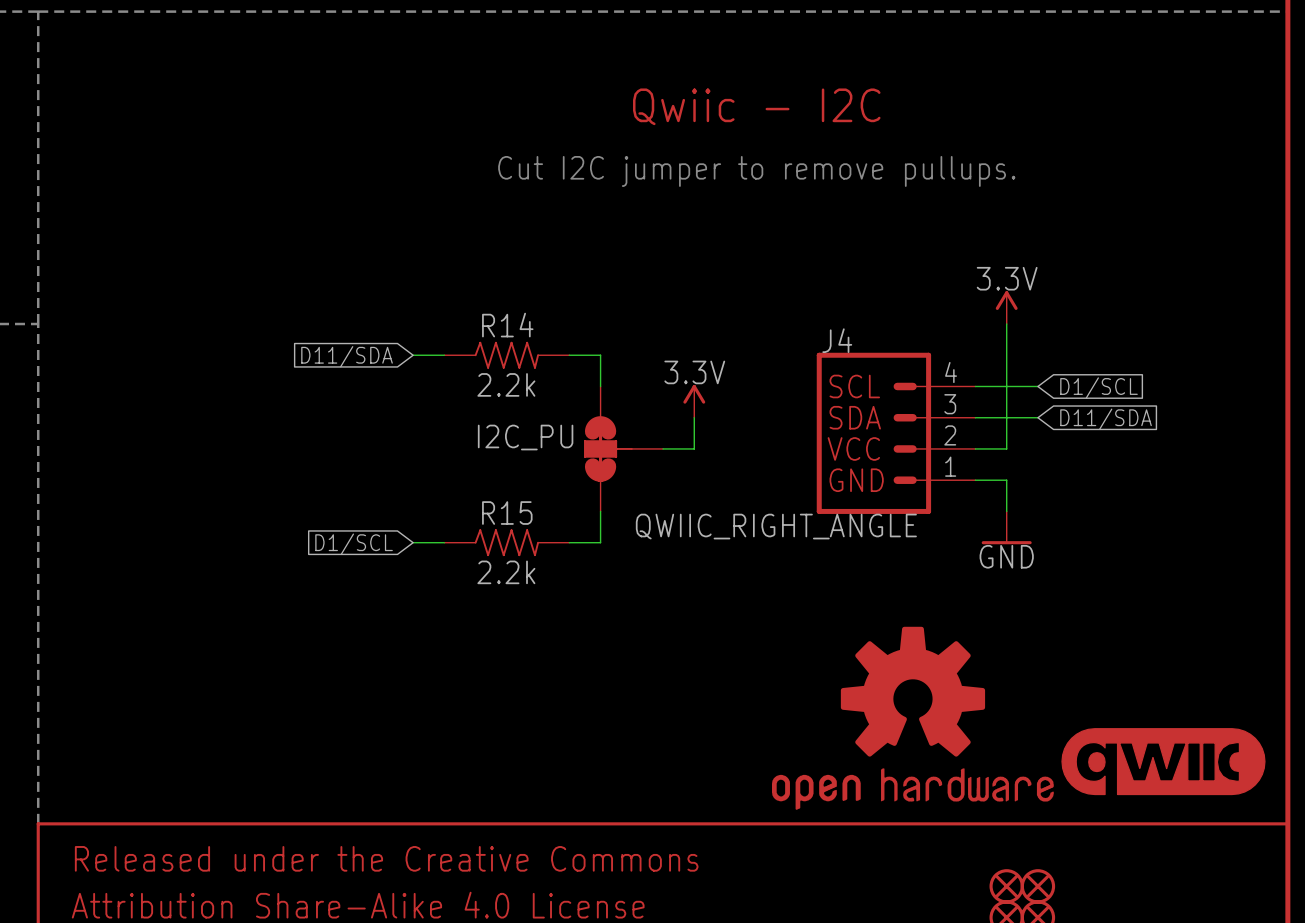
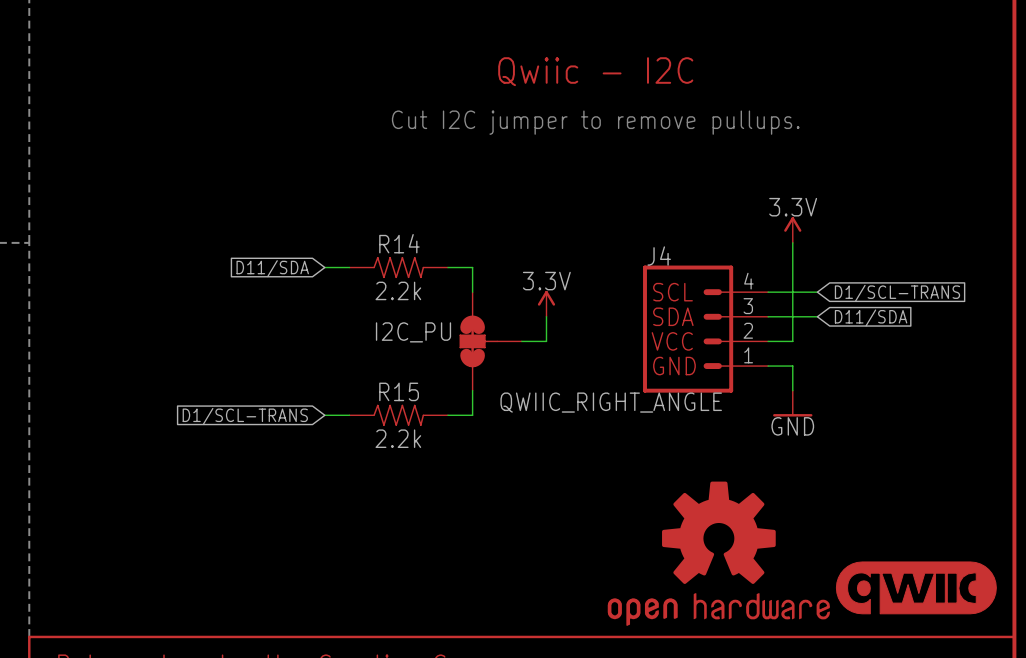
global label: D1/SCL (1099, 387) -> D1/SCL-TRANS (897, 293)
global label: D1/SCL (354, 544) -> D1/SCL-TRANS (245, 416)

